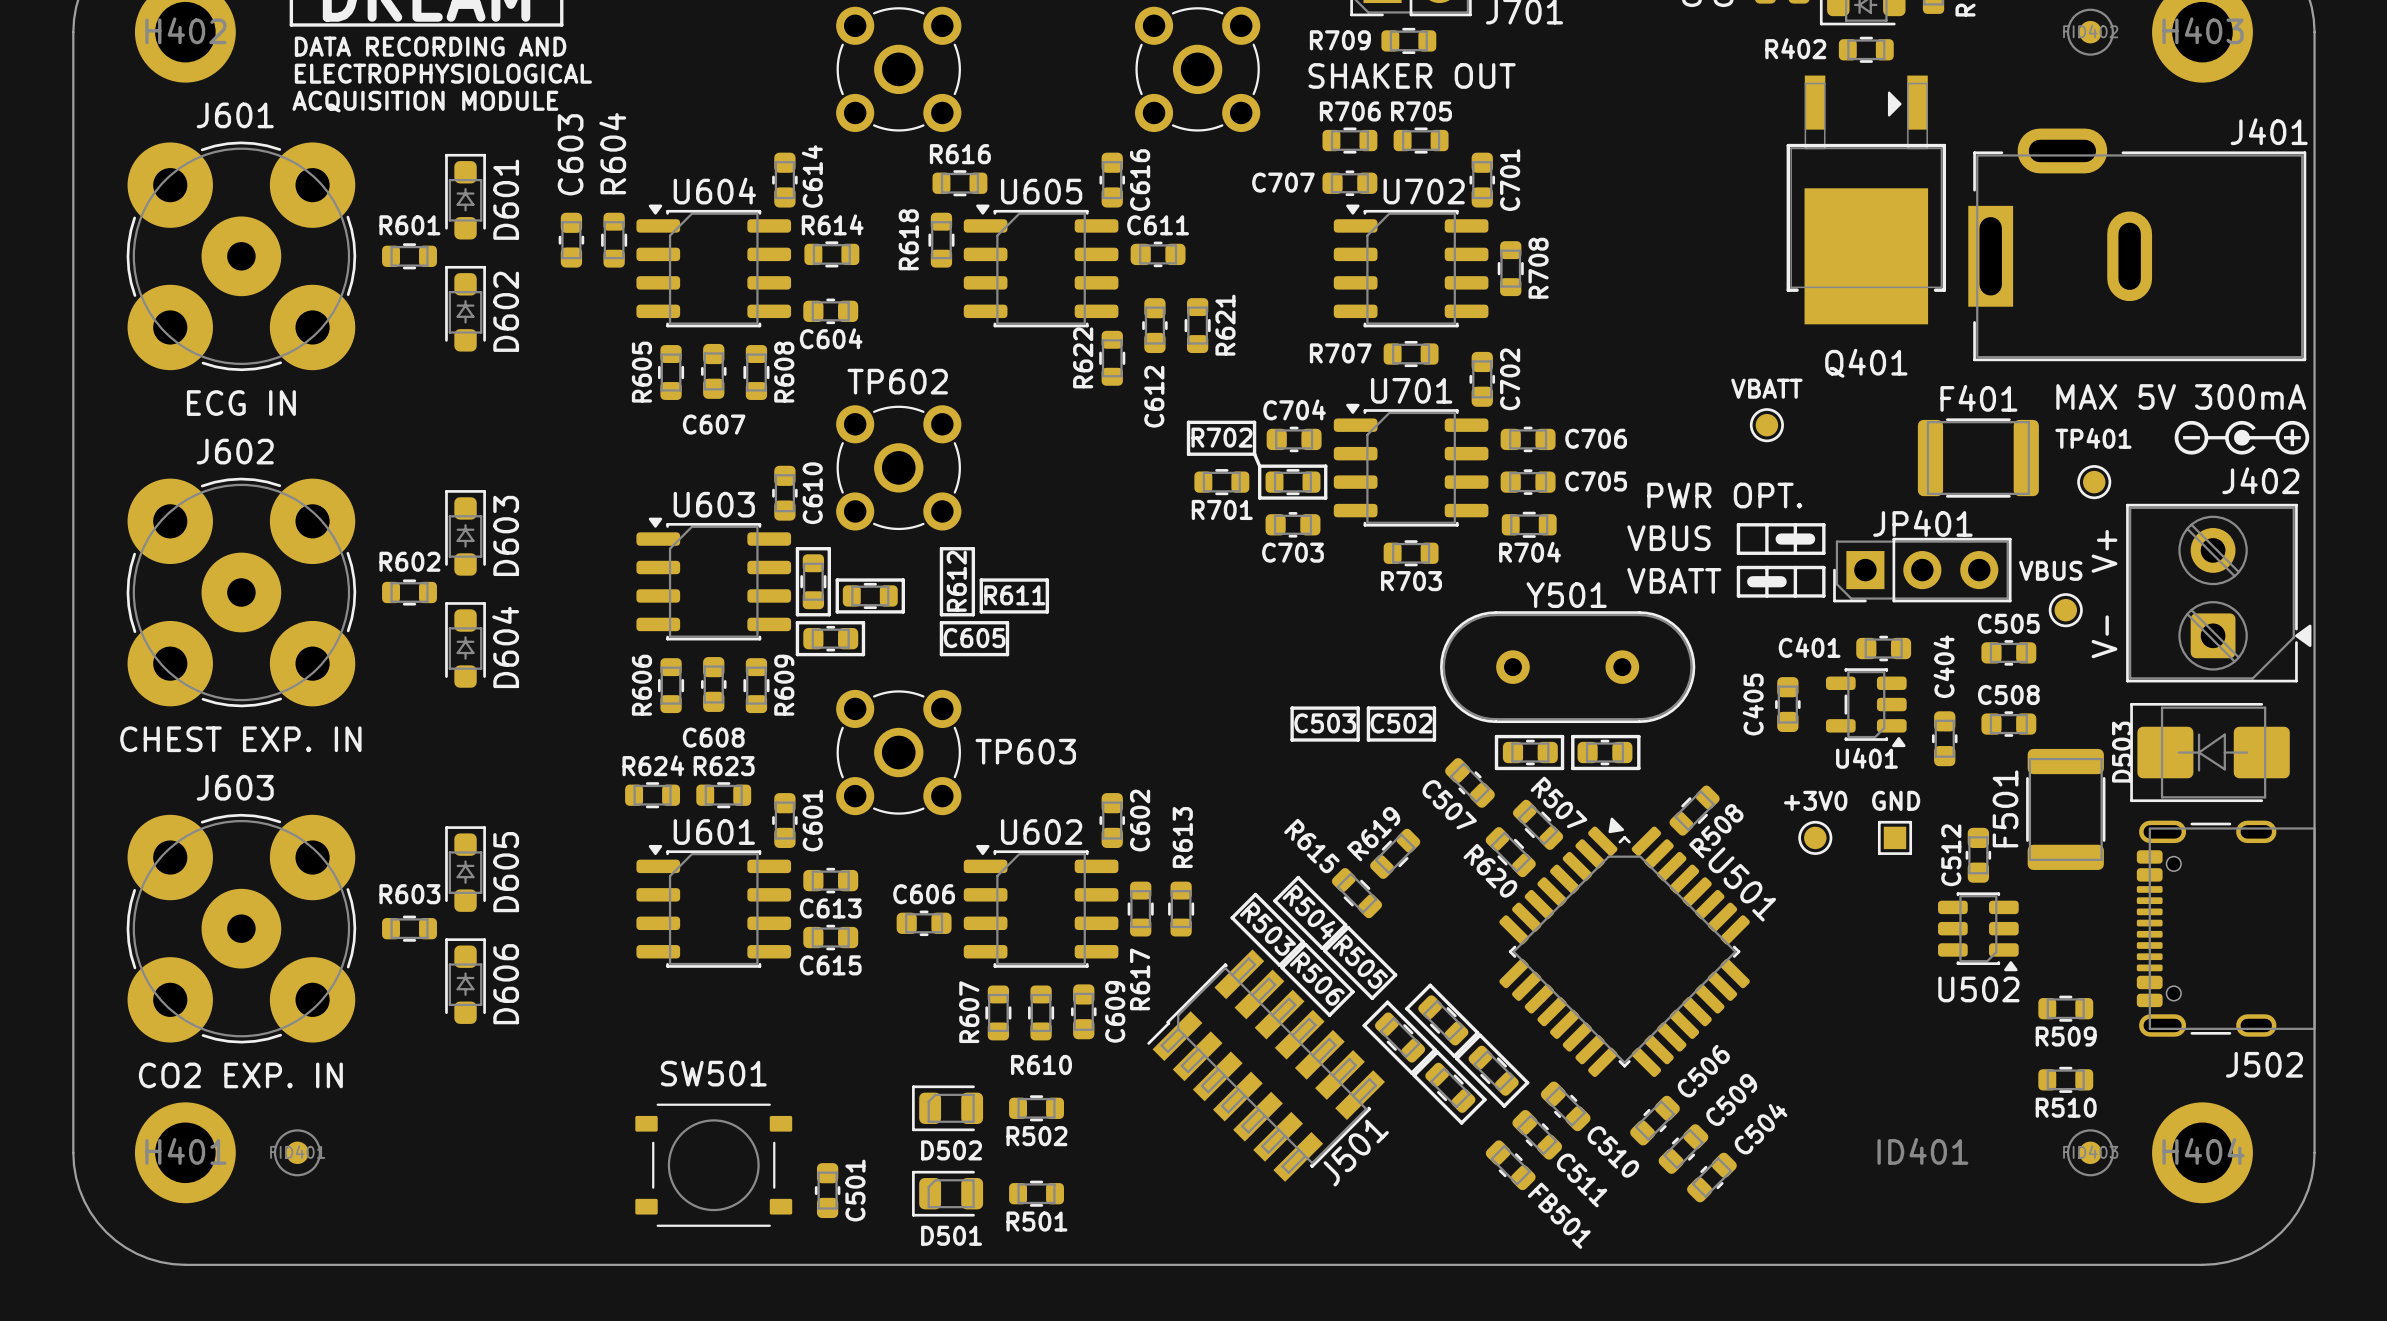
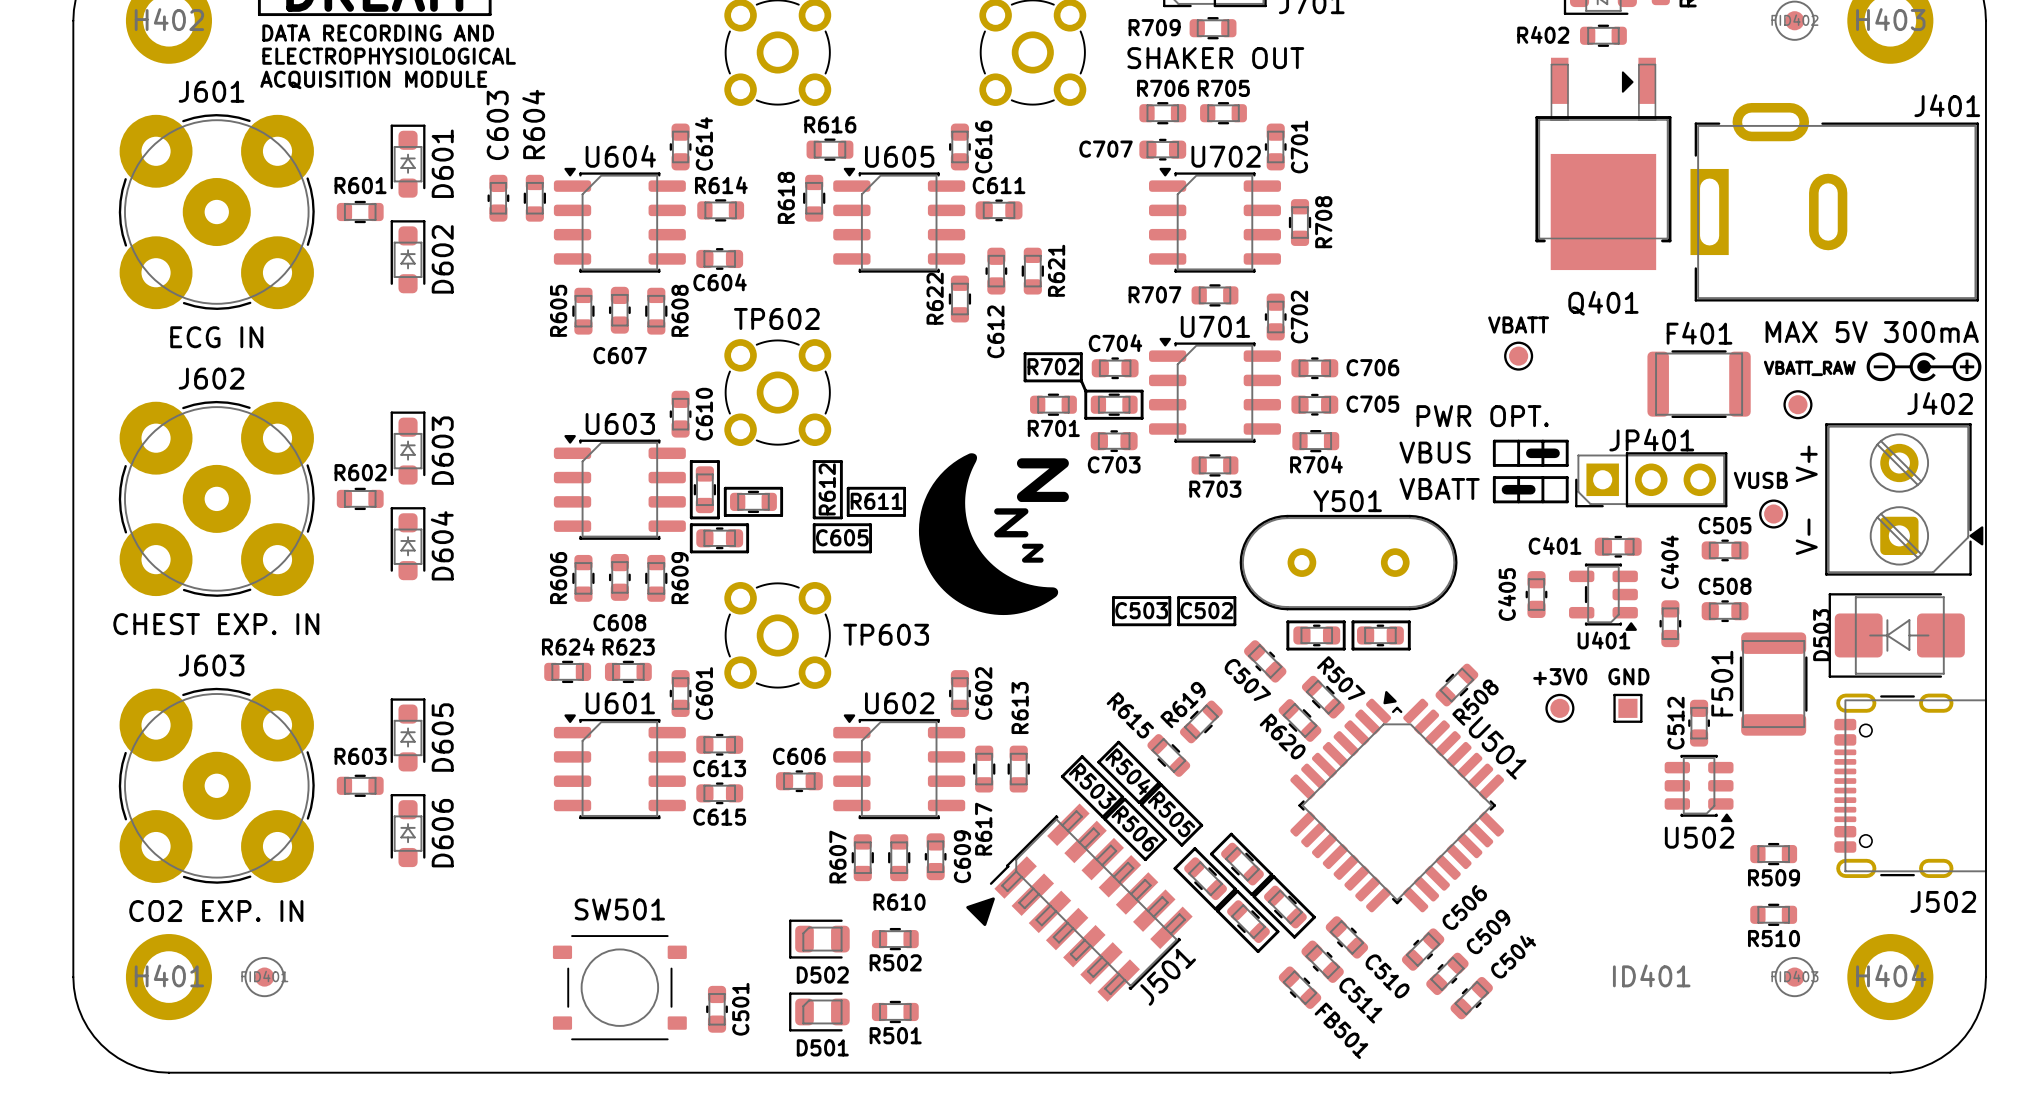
part text: TP401 (2093, 438) -> none
part text: none -> VBATT_RAW (1809, 368)
drawing: none -> [918, 453, 1069, 616]
part value: VBUS (2050, 570) -> VUSB (1760, 480)
drawing: none -> [966, 897, 995, 927]

